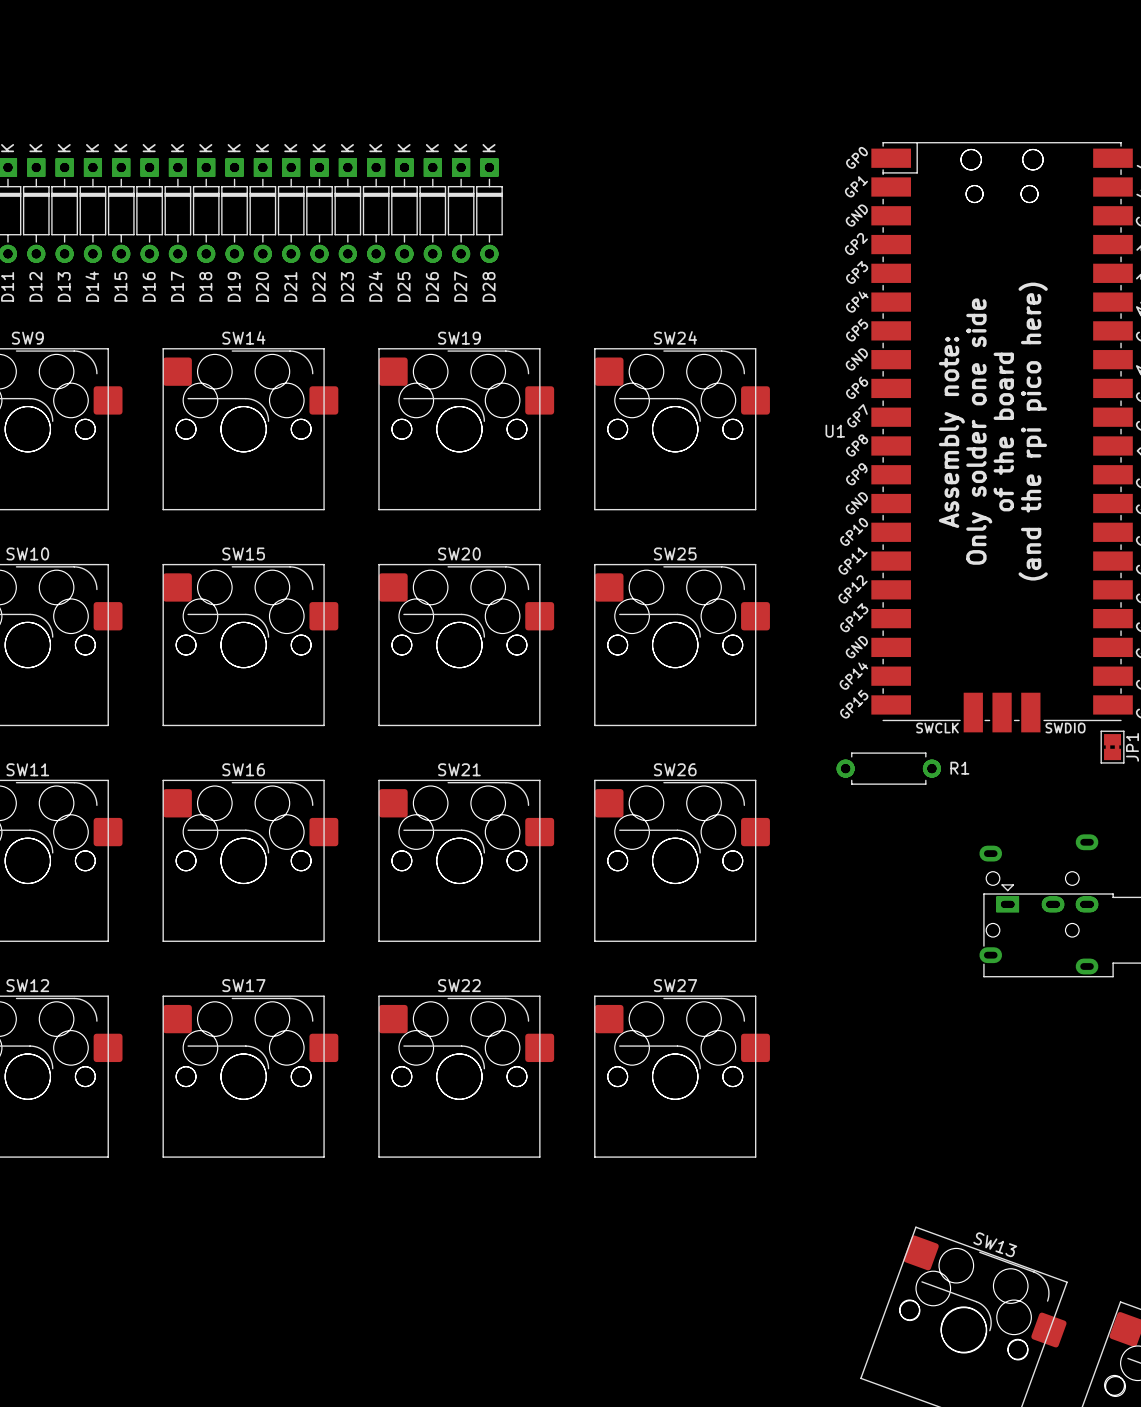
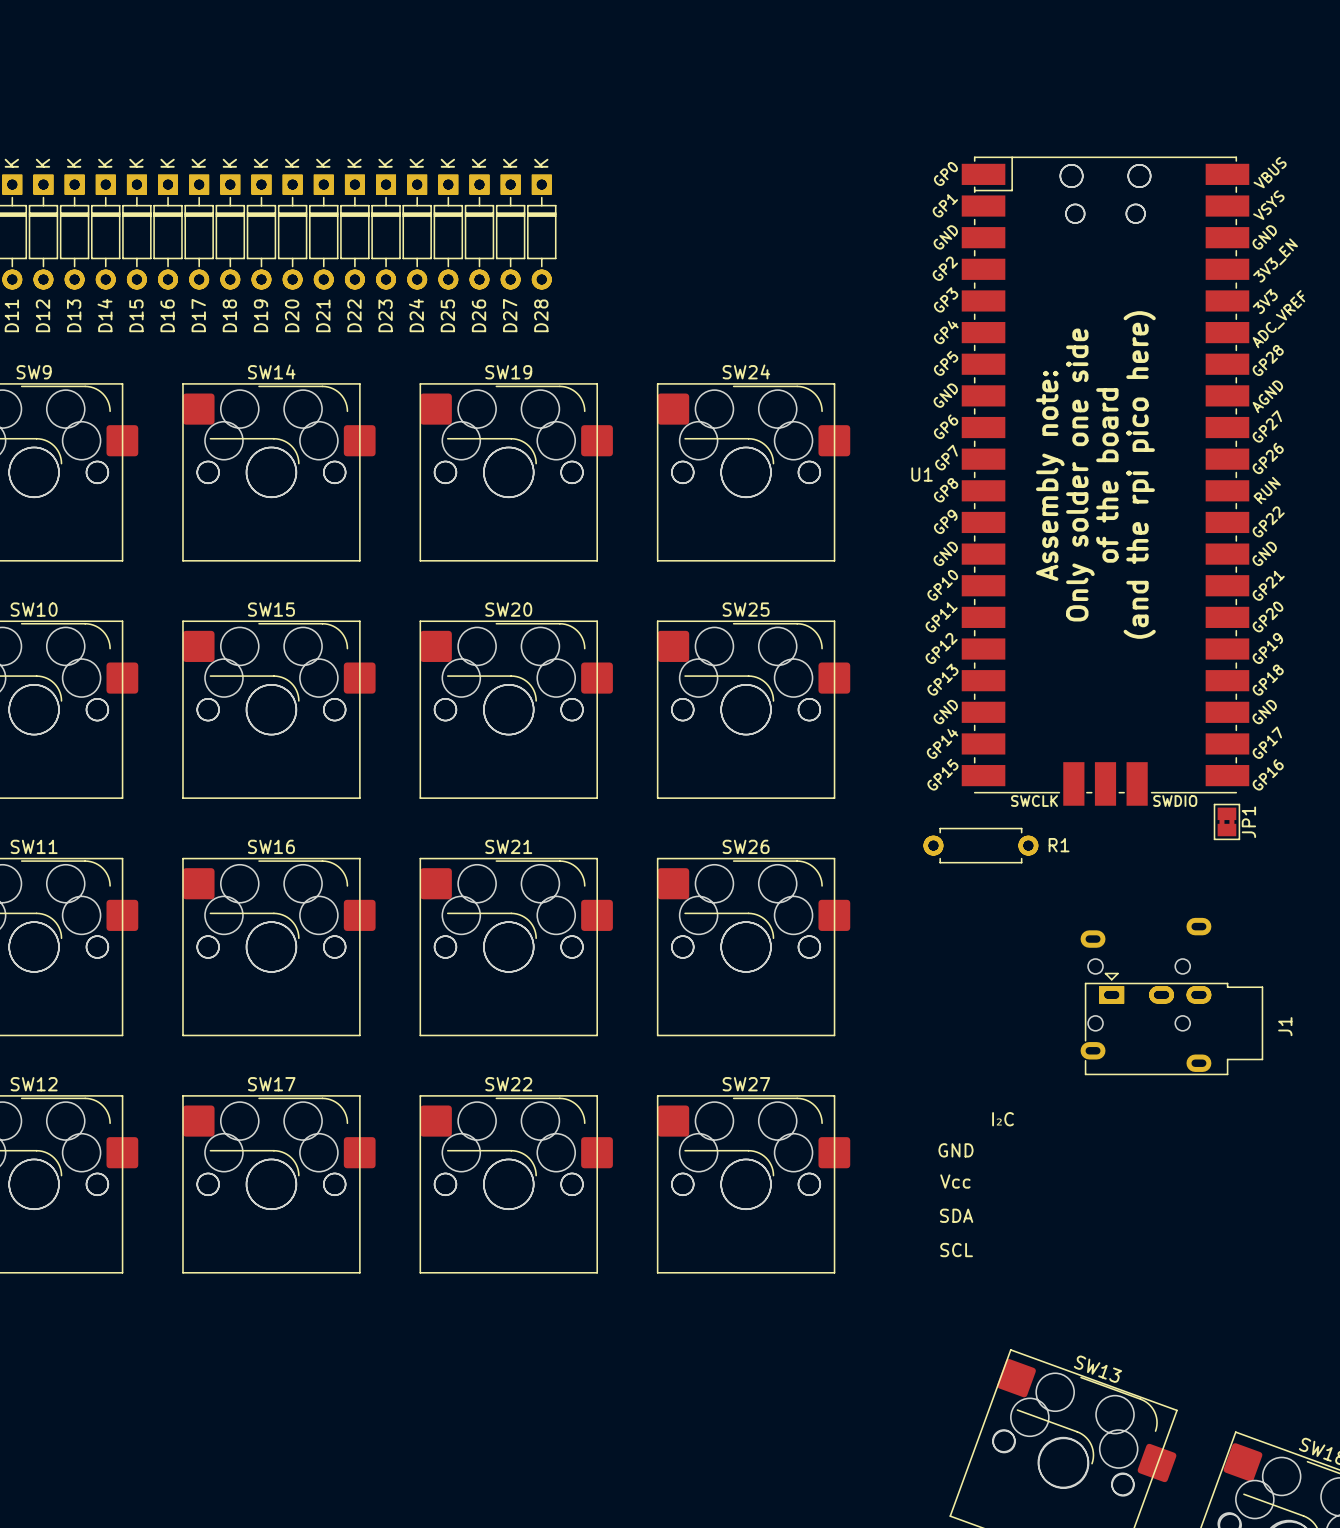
text: none -> I₂C (1003, 1119)
text: none -> GND (956, 1150)
text: none -> Vcc (955, 1181)
text: none -> SDA (956, 1215)
text: none -> SCL (956, 1250)

